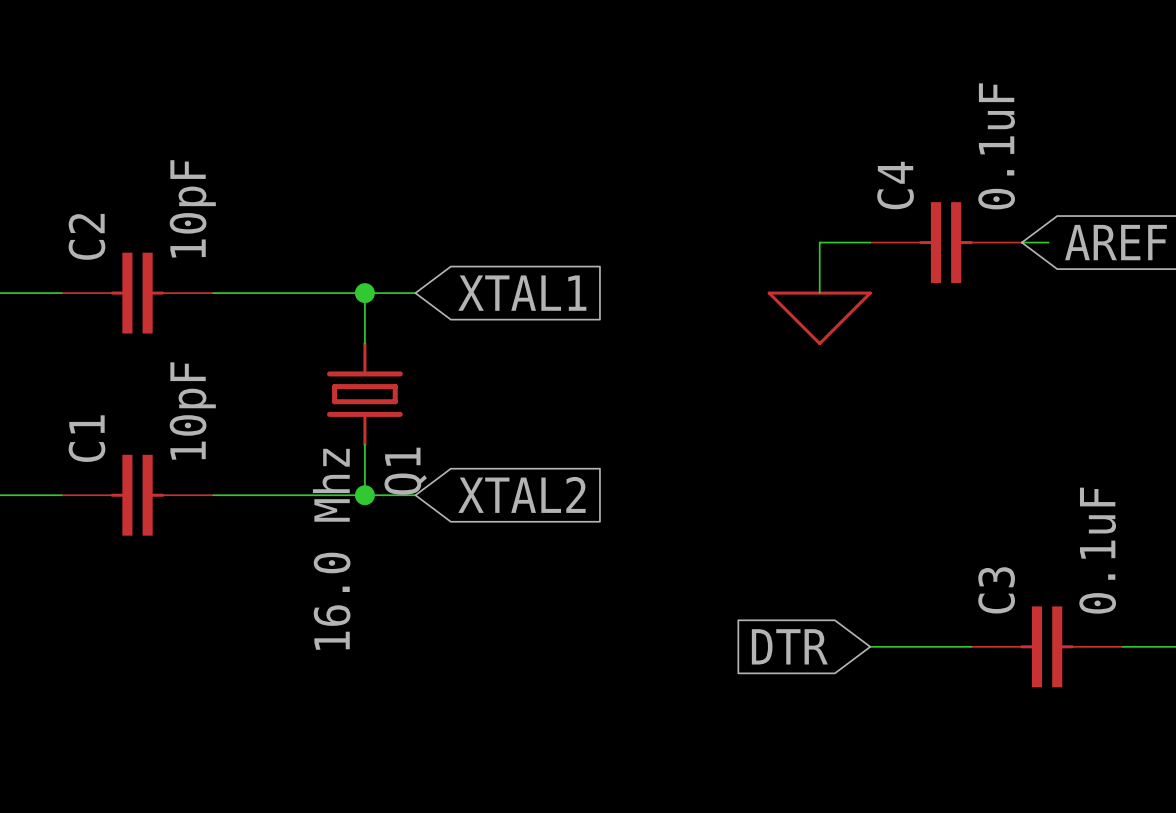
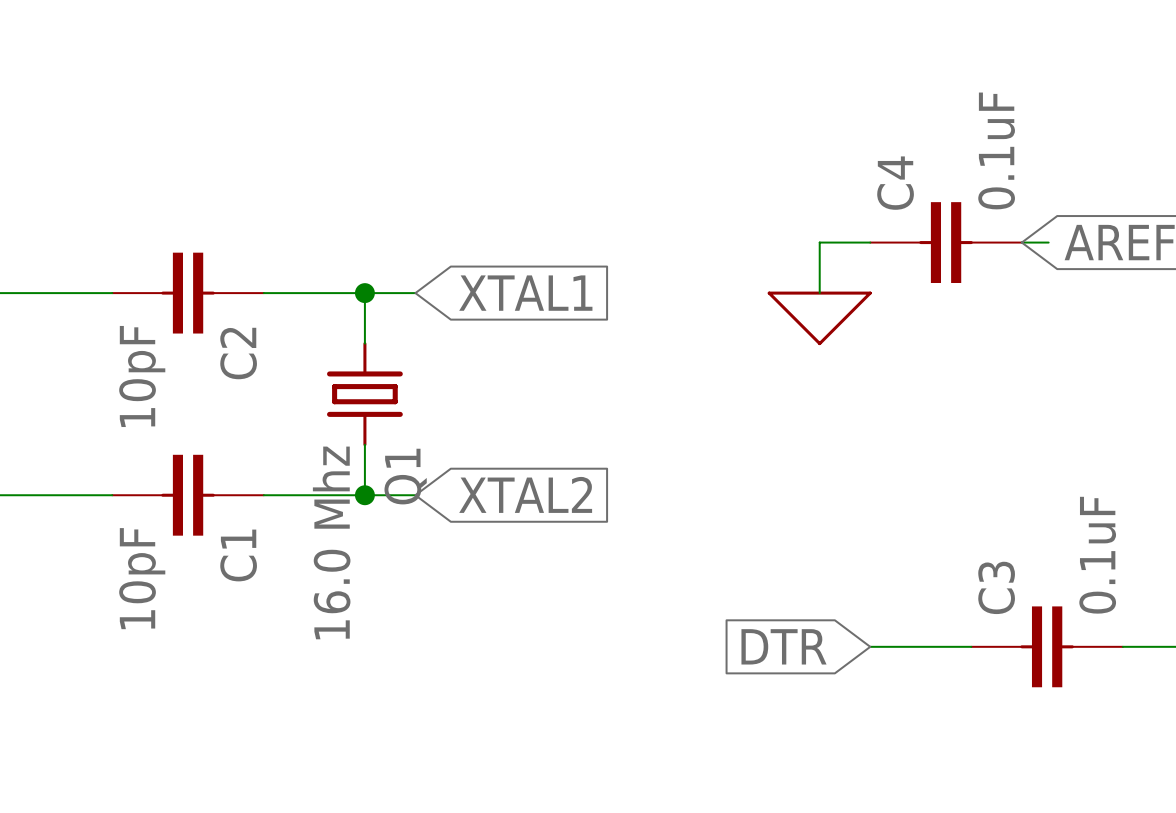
C2 value position: 10pF (192, 208) -> 10pF (142, 376)
C2 name position: C2 (87, 236) -> C2 (238, 353)
C2 position: (137, 293) -> (188, 293)
C1 value position: 10pF (192, 411) -> 10pF (142, 578)
C1 name position: C1 (87, 438) -> C1 (238, 555)
C1 position: (137, 495) -> (188, 495)

